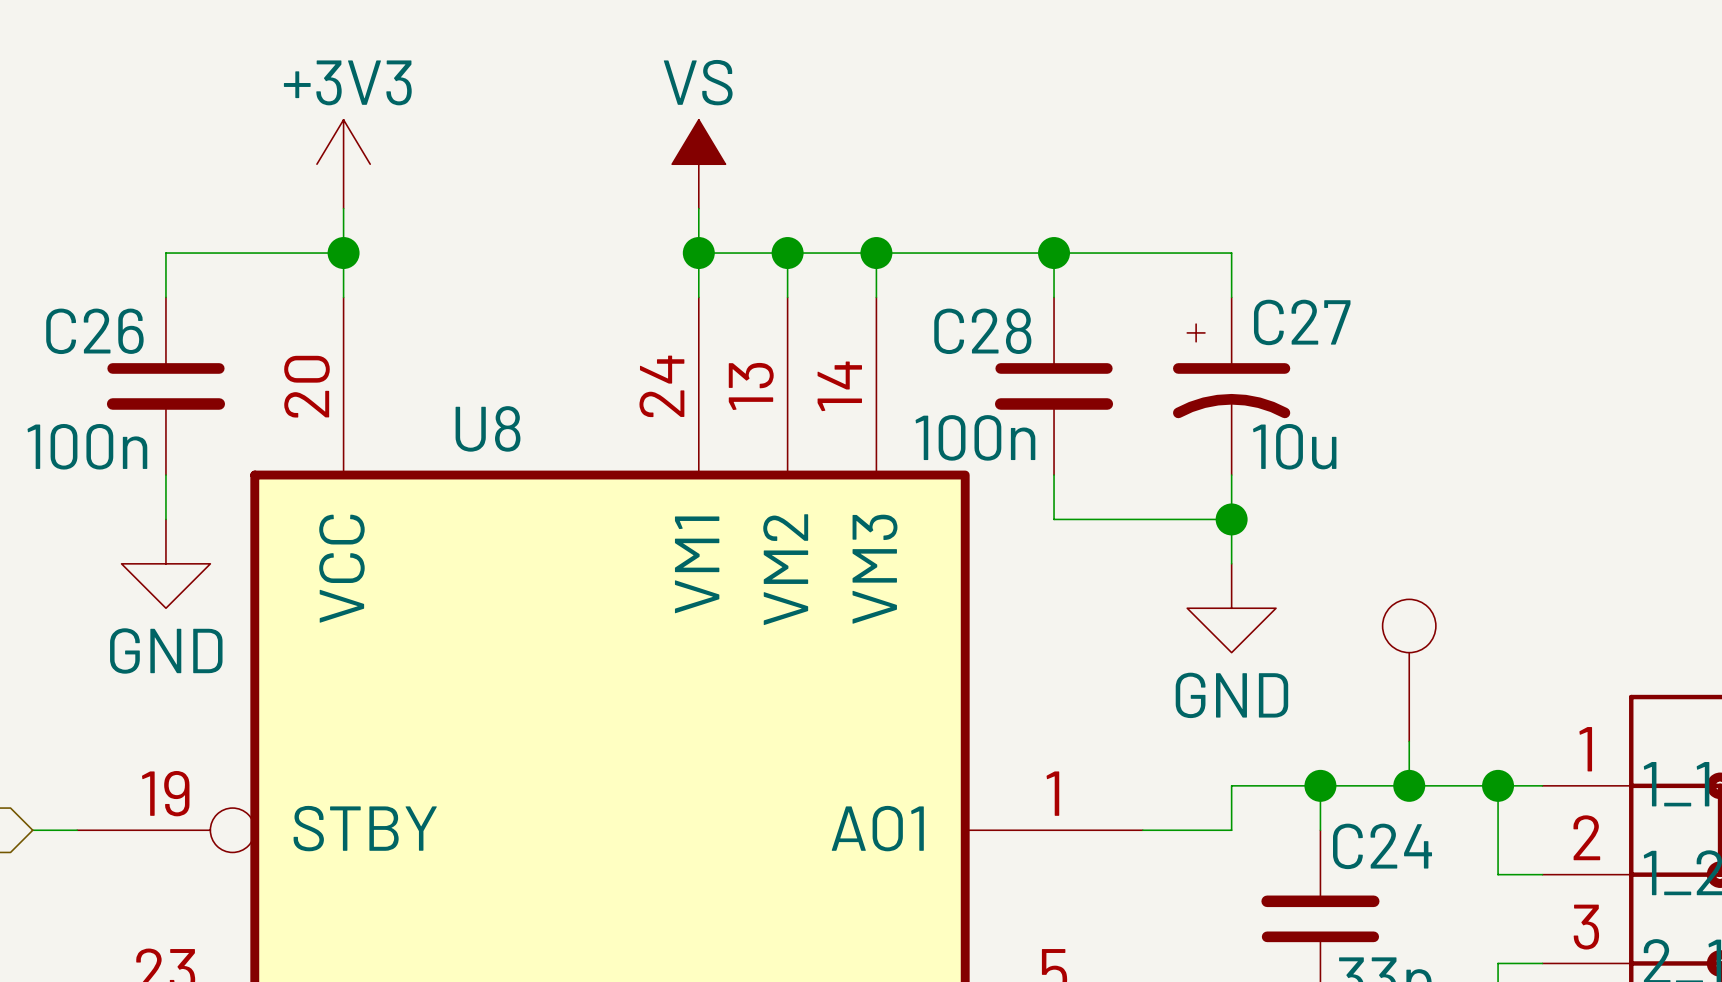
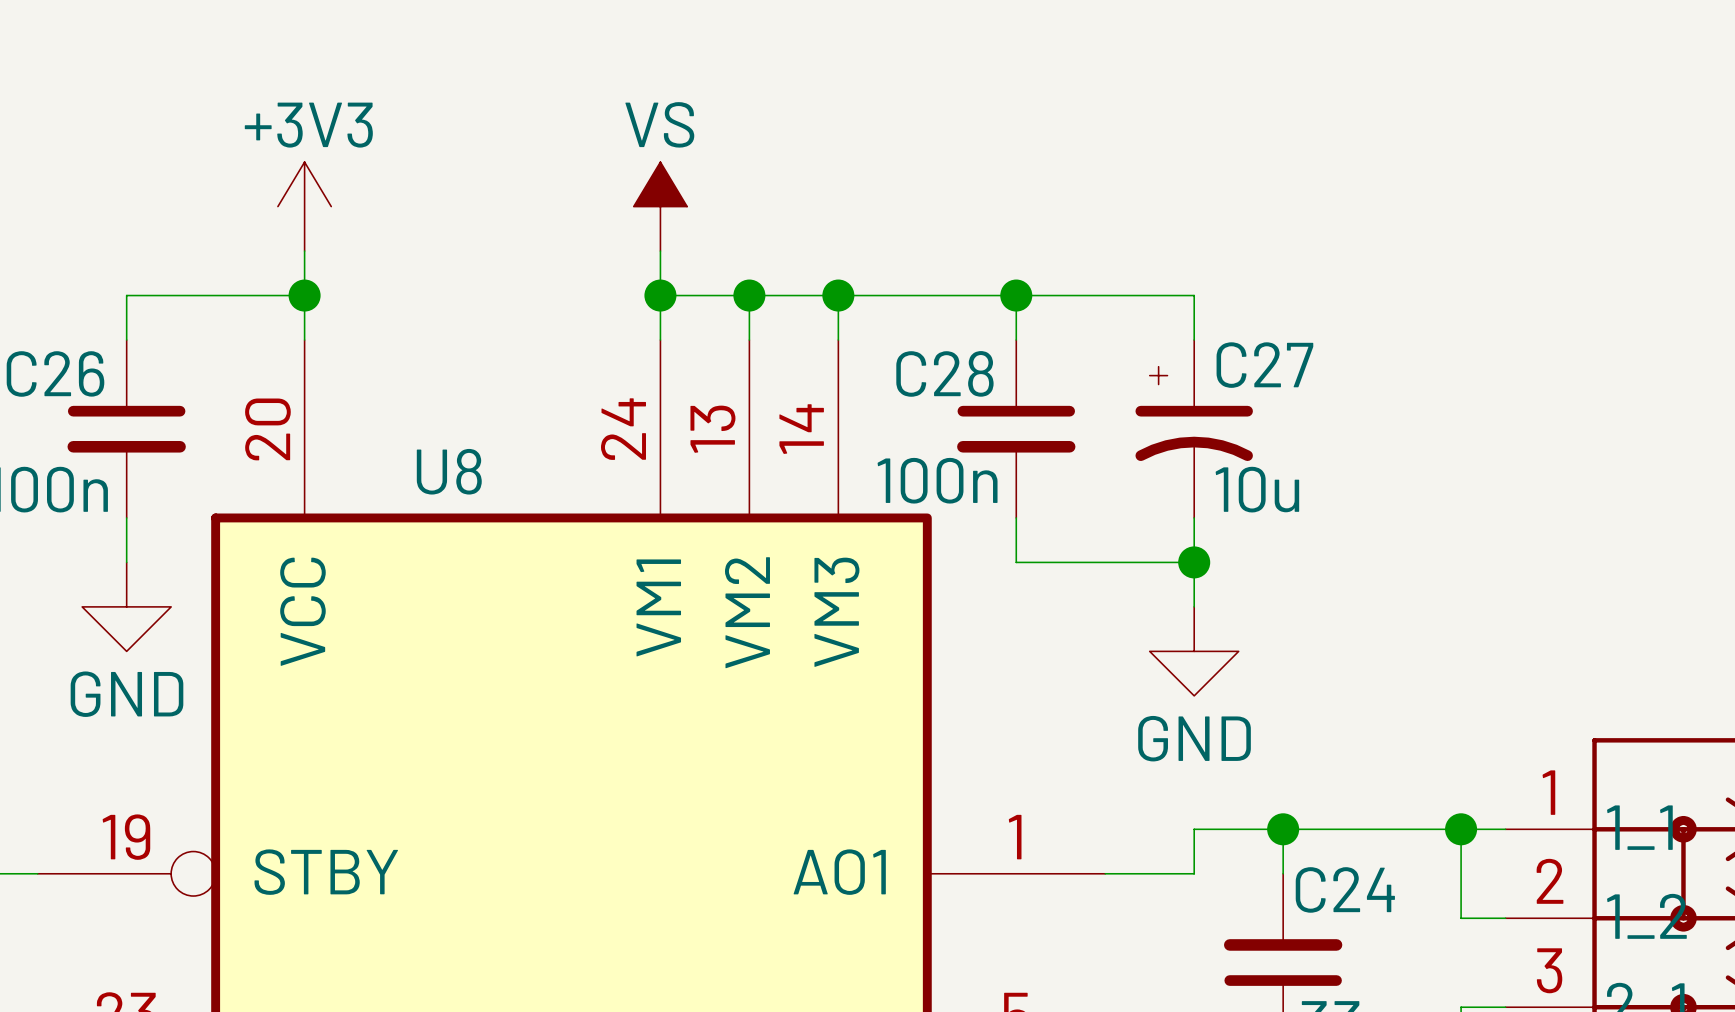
part: (1409, 670) -> none
wire: (1409, 741) (1409, 785) -> none
junction: (1409, 785) -> none

